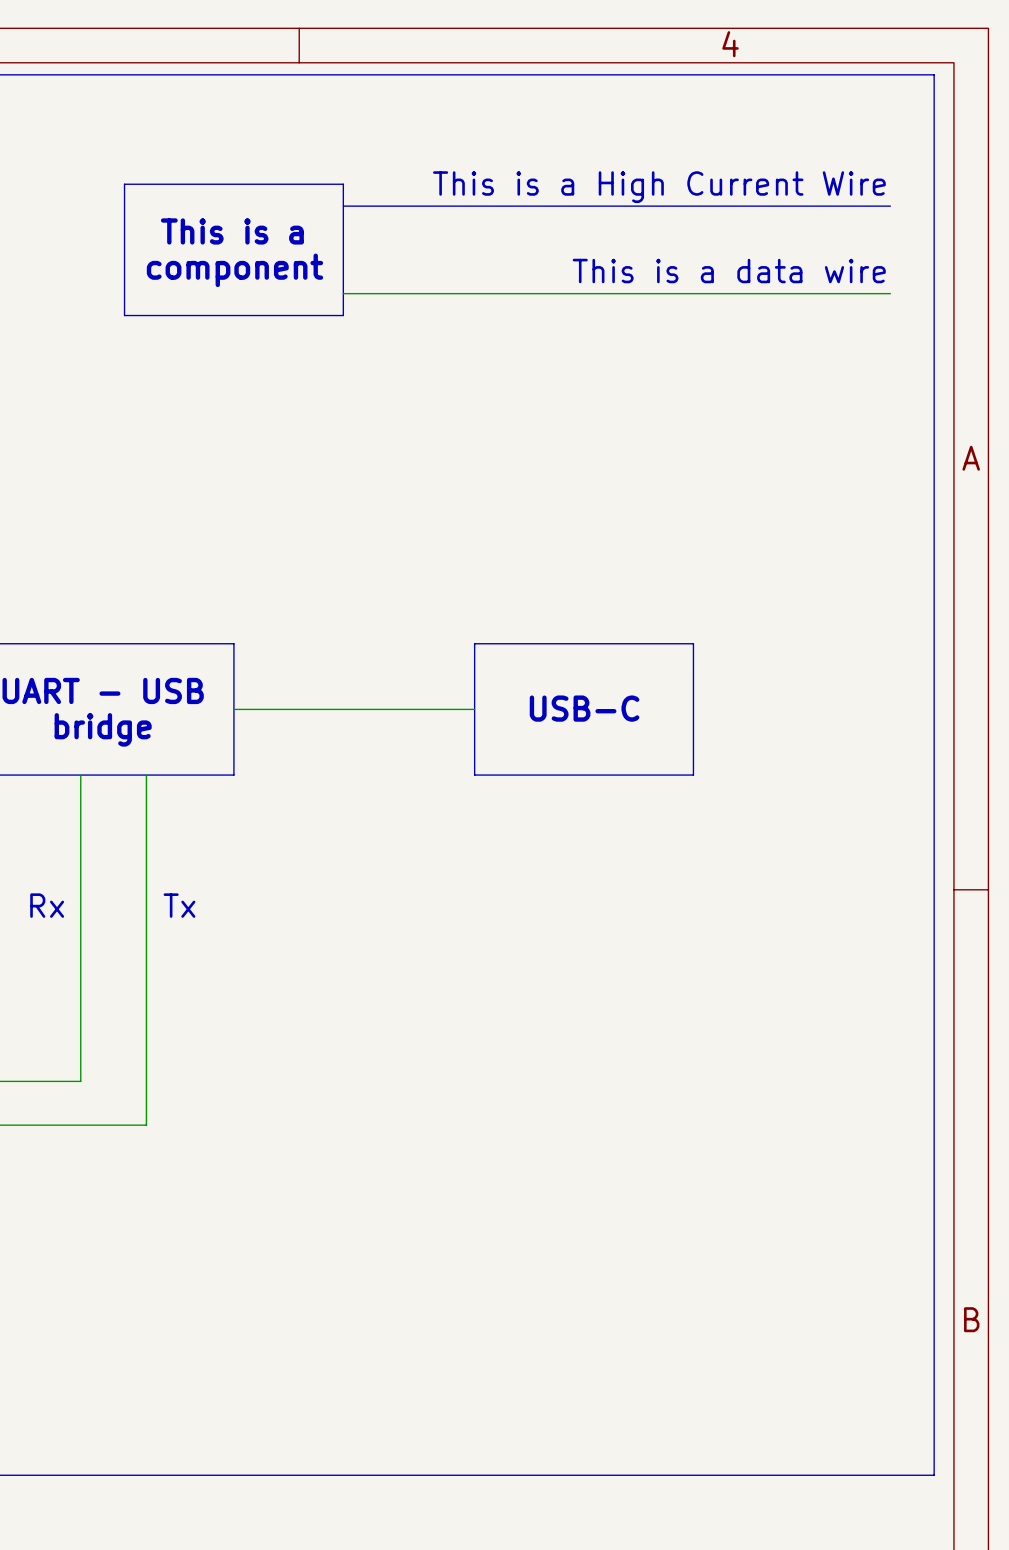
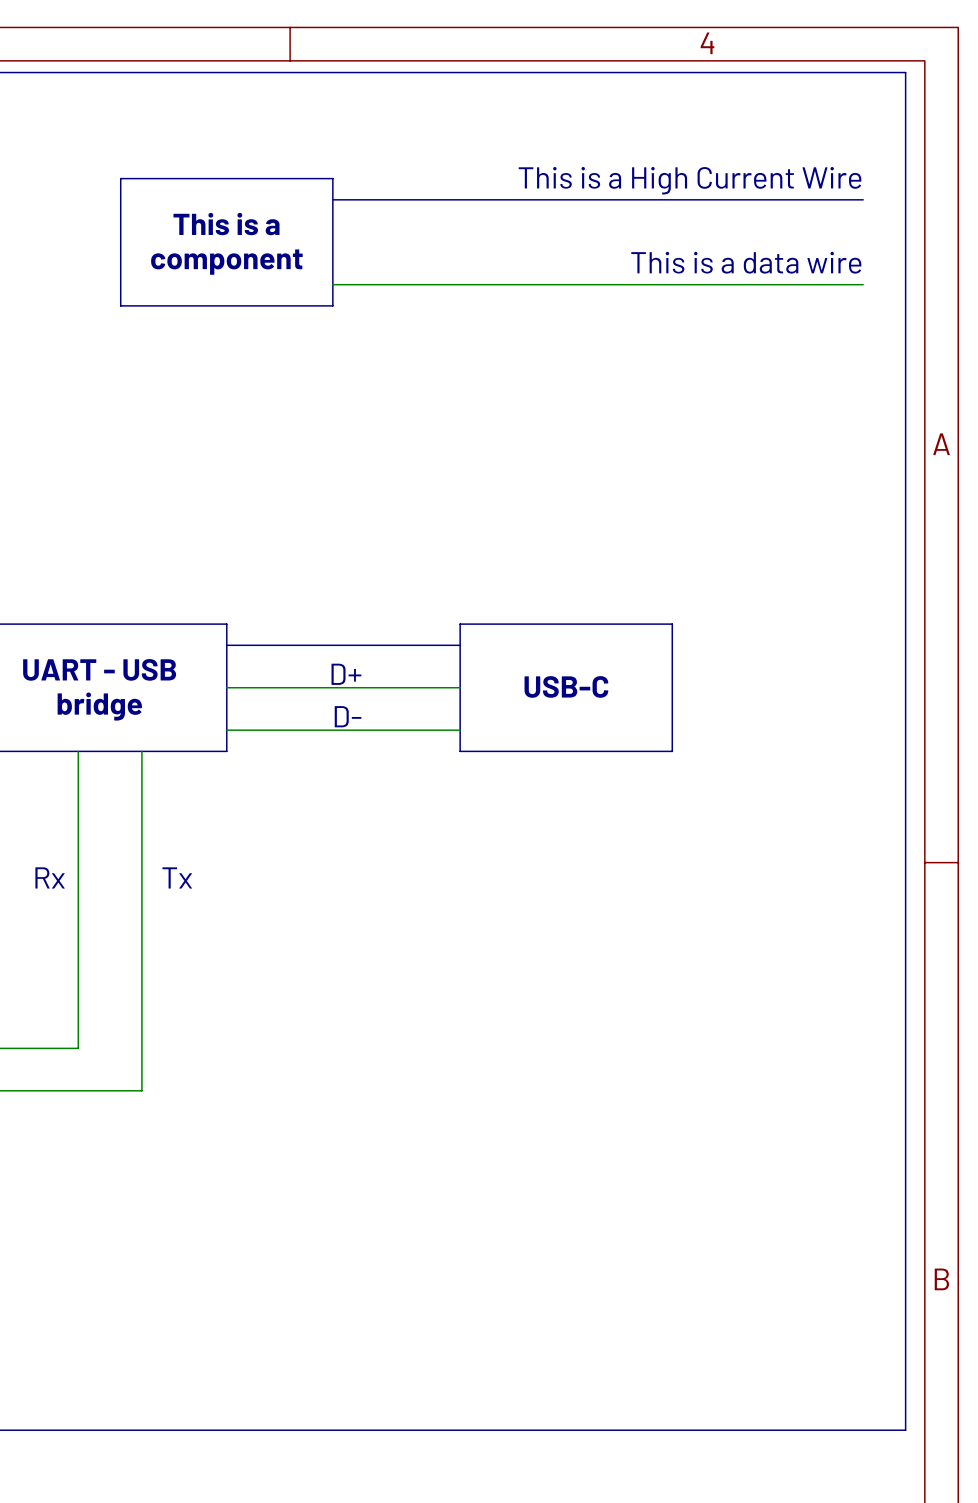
bus: none -> (226, 645) (460, 645)
text: none -> D+ (346, 674)
text: none -> D- (348, 716)
wire: none -> (226, 730) (460, 730)

